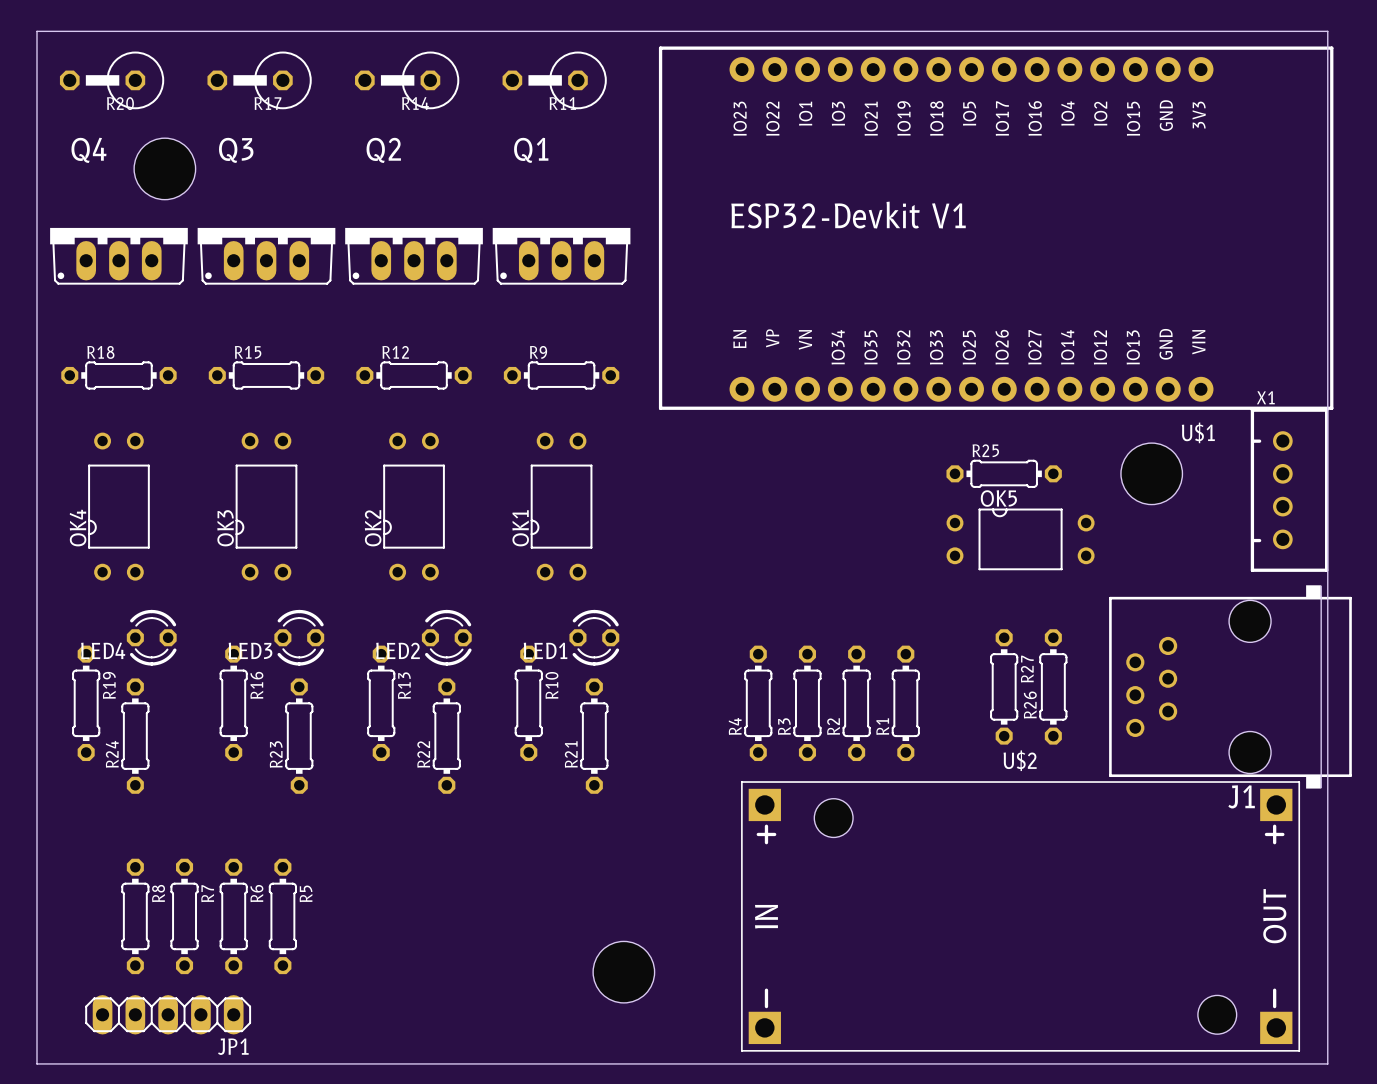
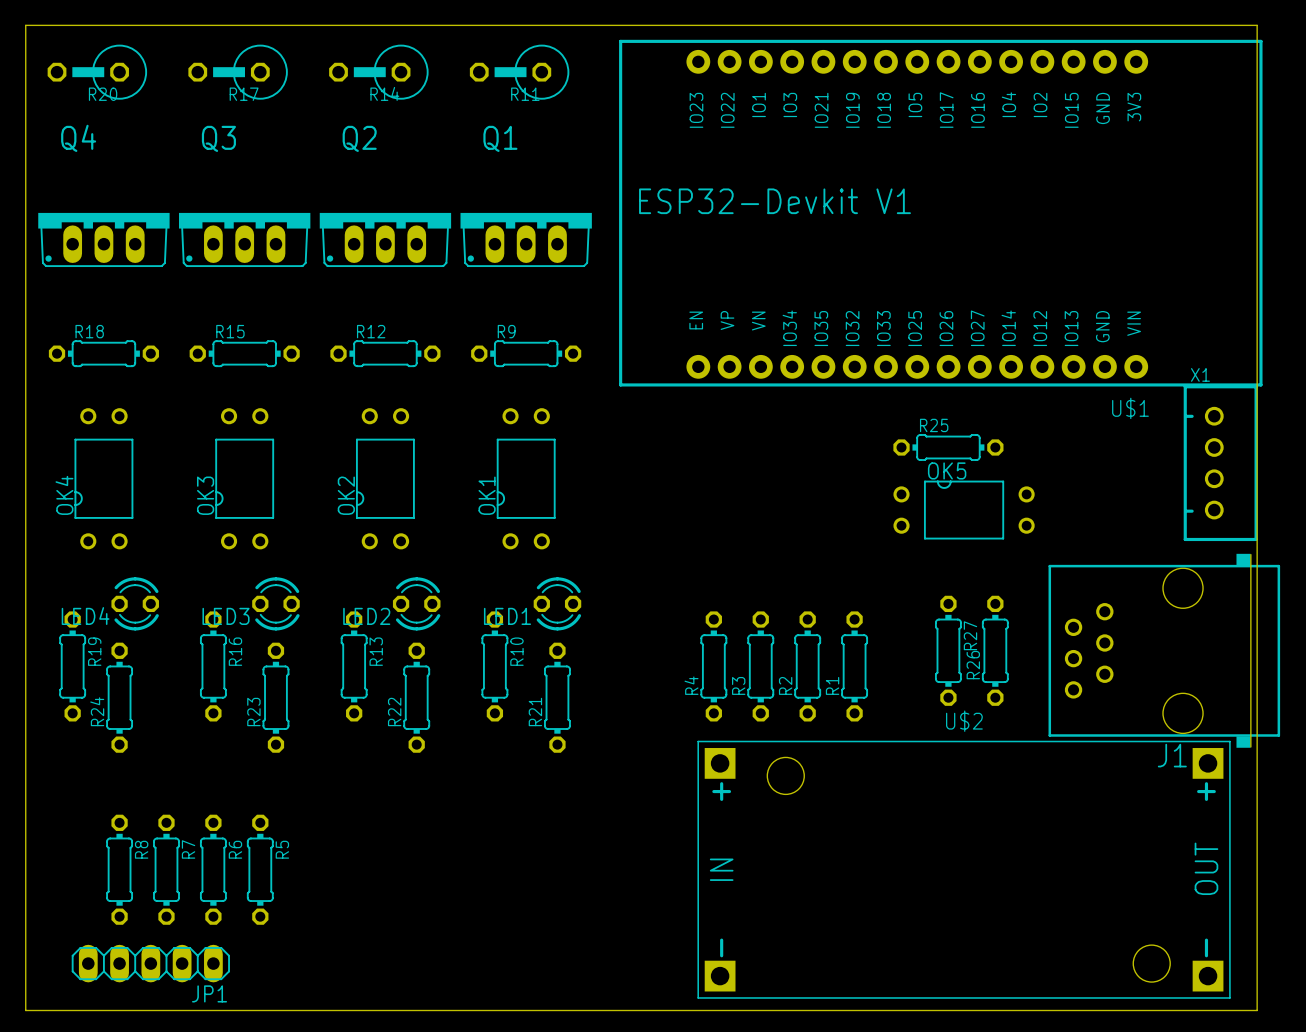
hole: (164, 168) -> none
hole: (1151, 473) -> none
hole: (623, 972) -> none

